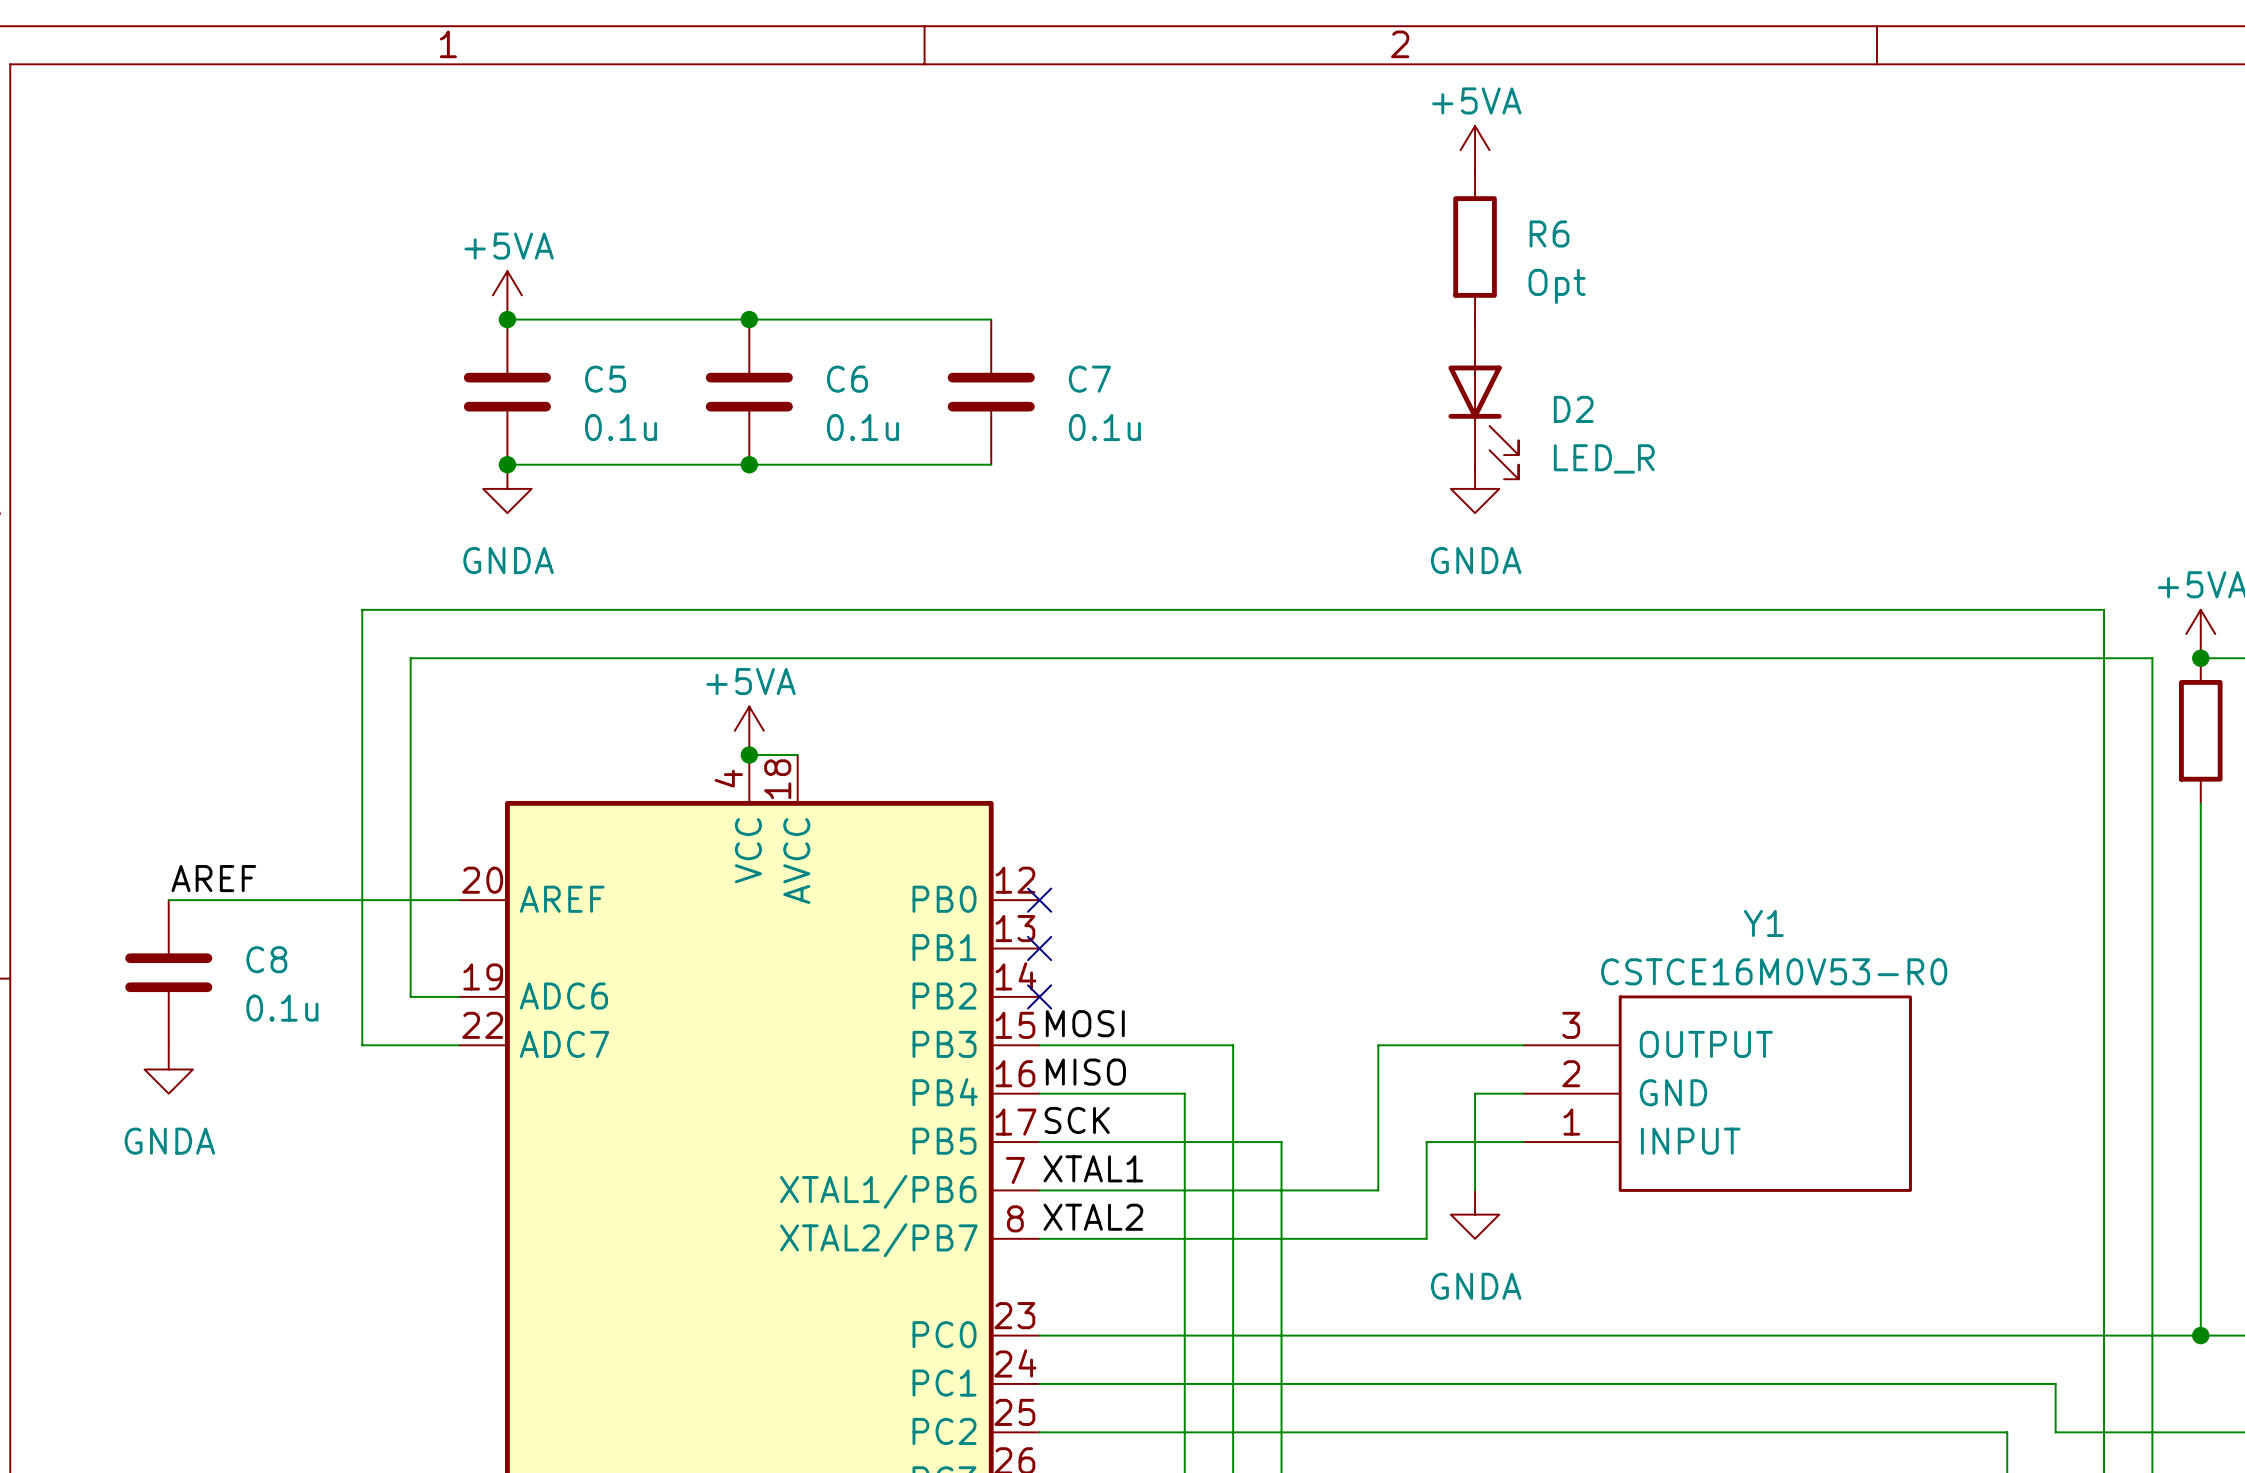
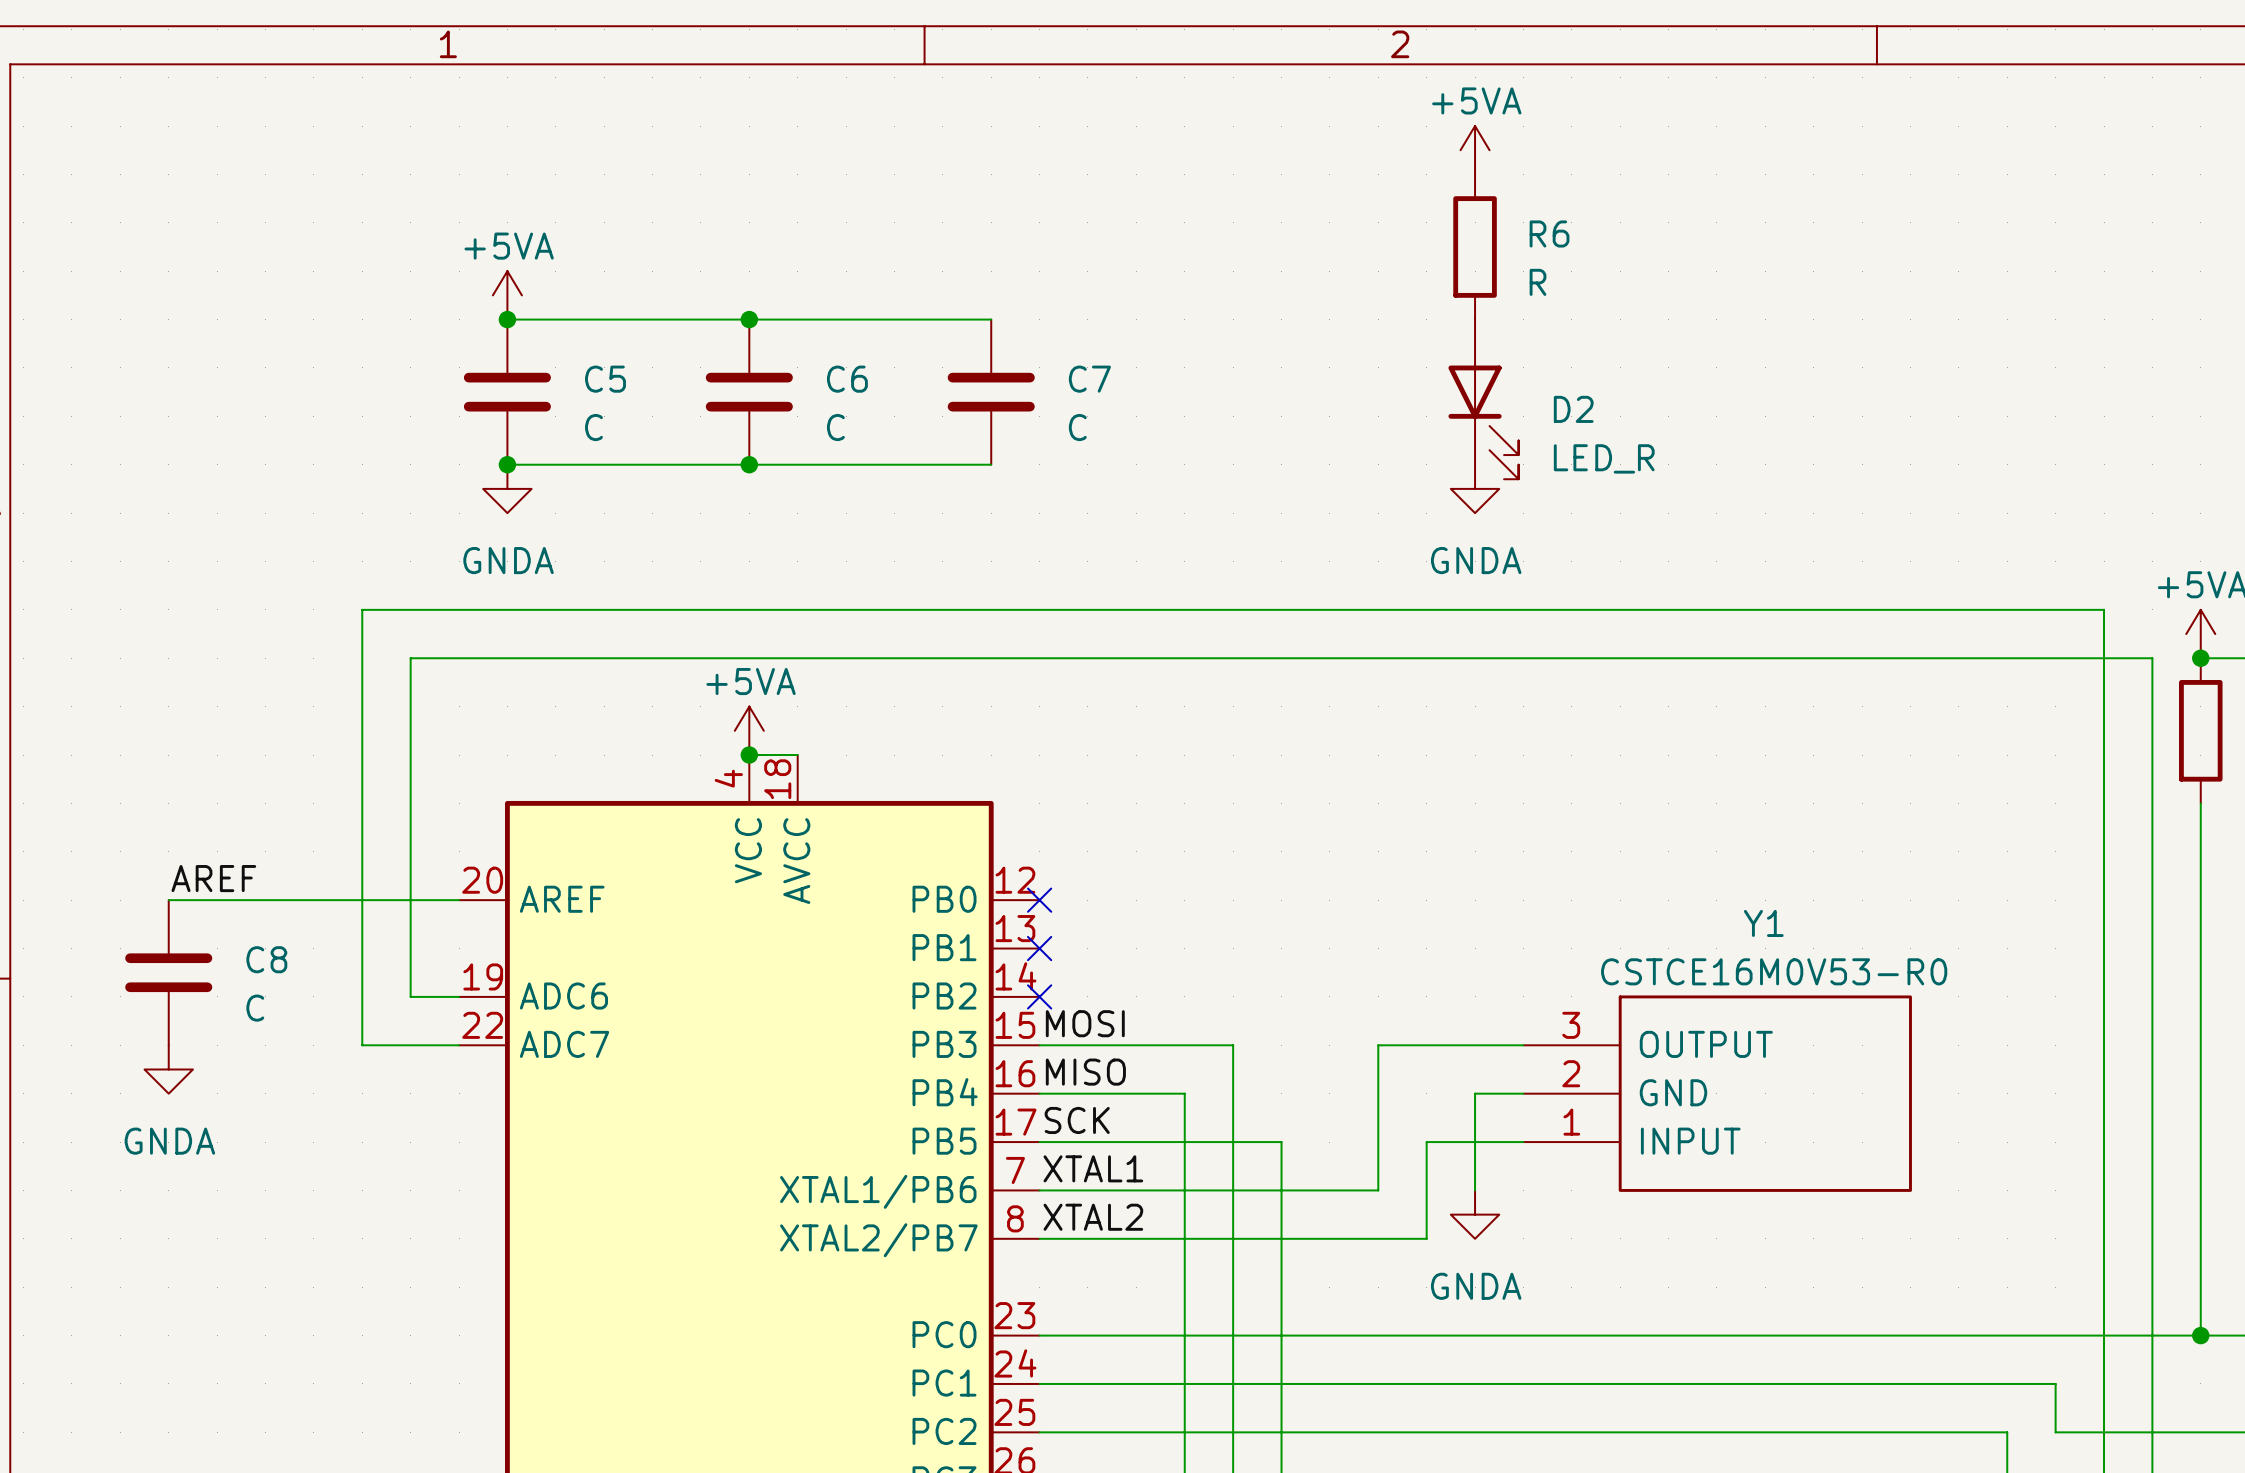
R6 value: Opt (1557, 286) -> R (1538, 282)
C5 value: 0.1u (621, 427) -> C (593, 427)
C6 value: 0.1u (862, 427) -> C (835, 427)
C7 value: 0.1u (1104, 427) -> C (1077, 427)
C8 value: 0.1u (282, 1008) -> C (255, 1008)

